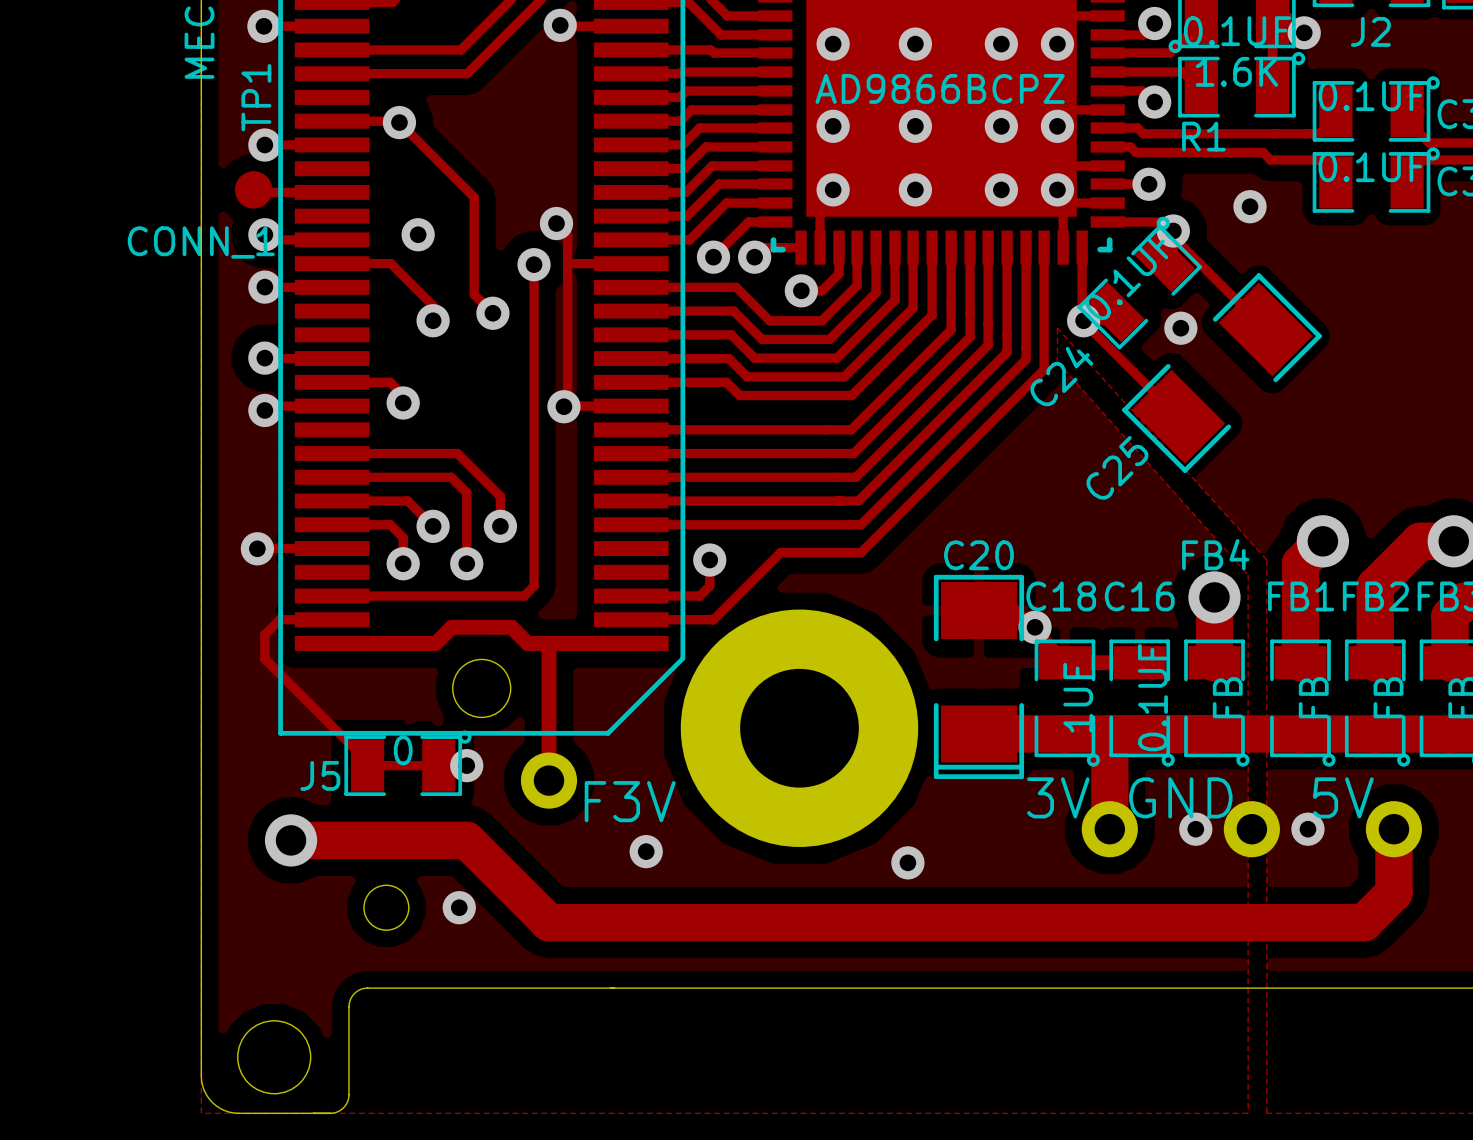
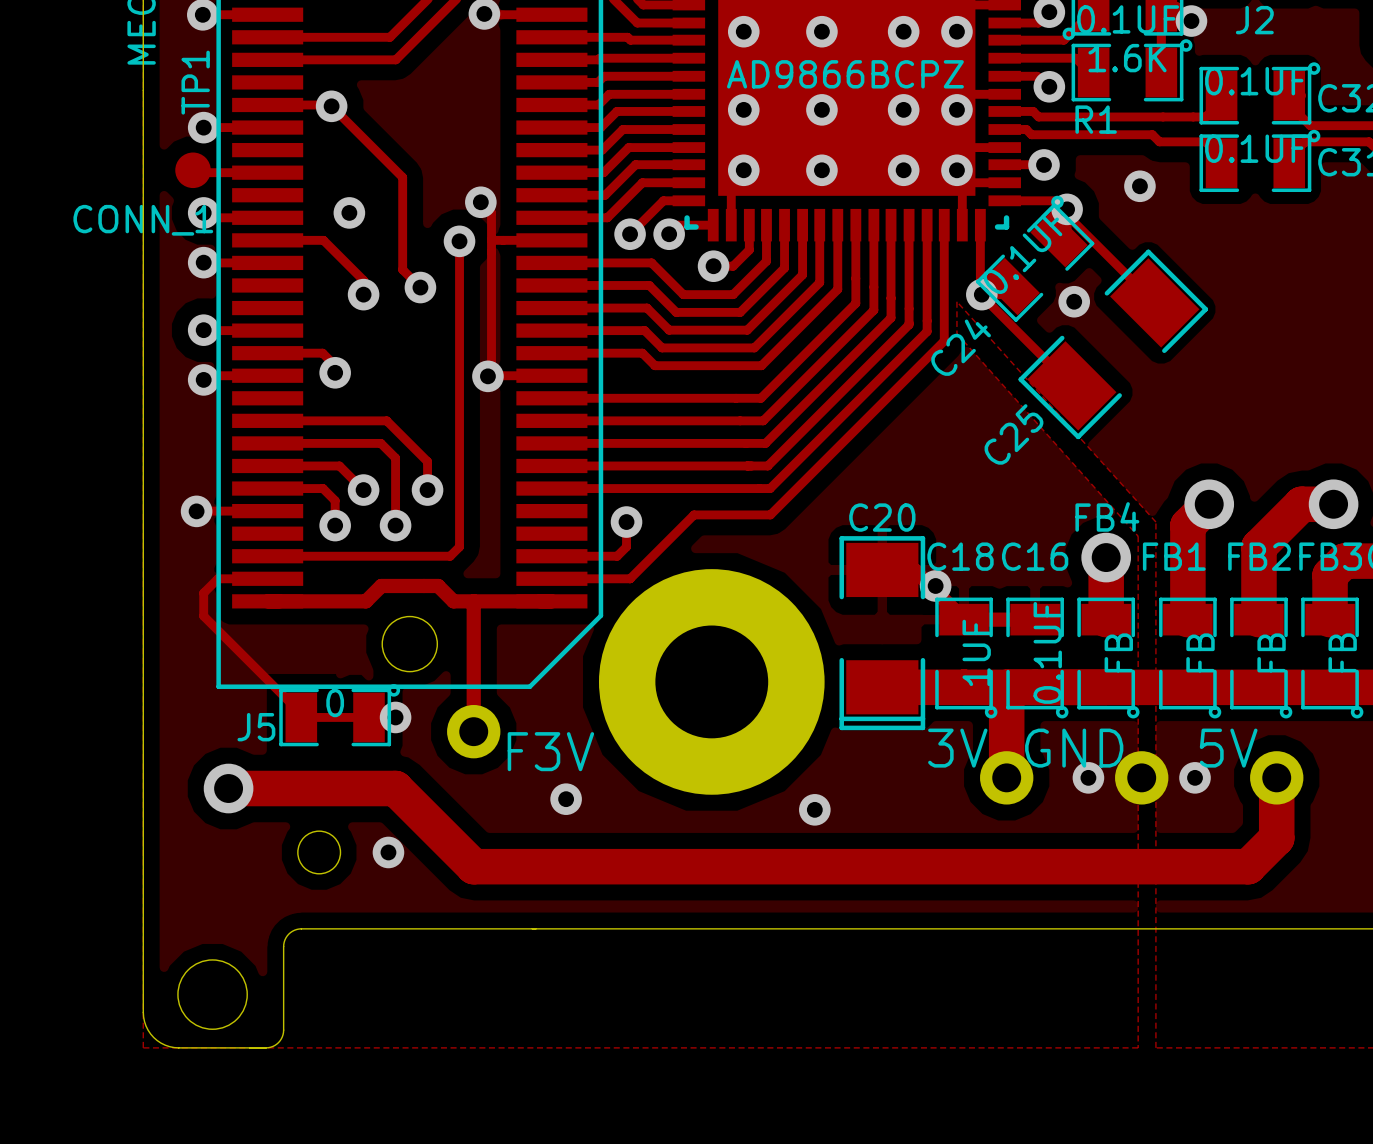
FB1 name position: FB1 (1301, 596) -> FB1 (1174, 556)

